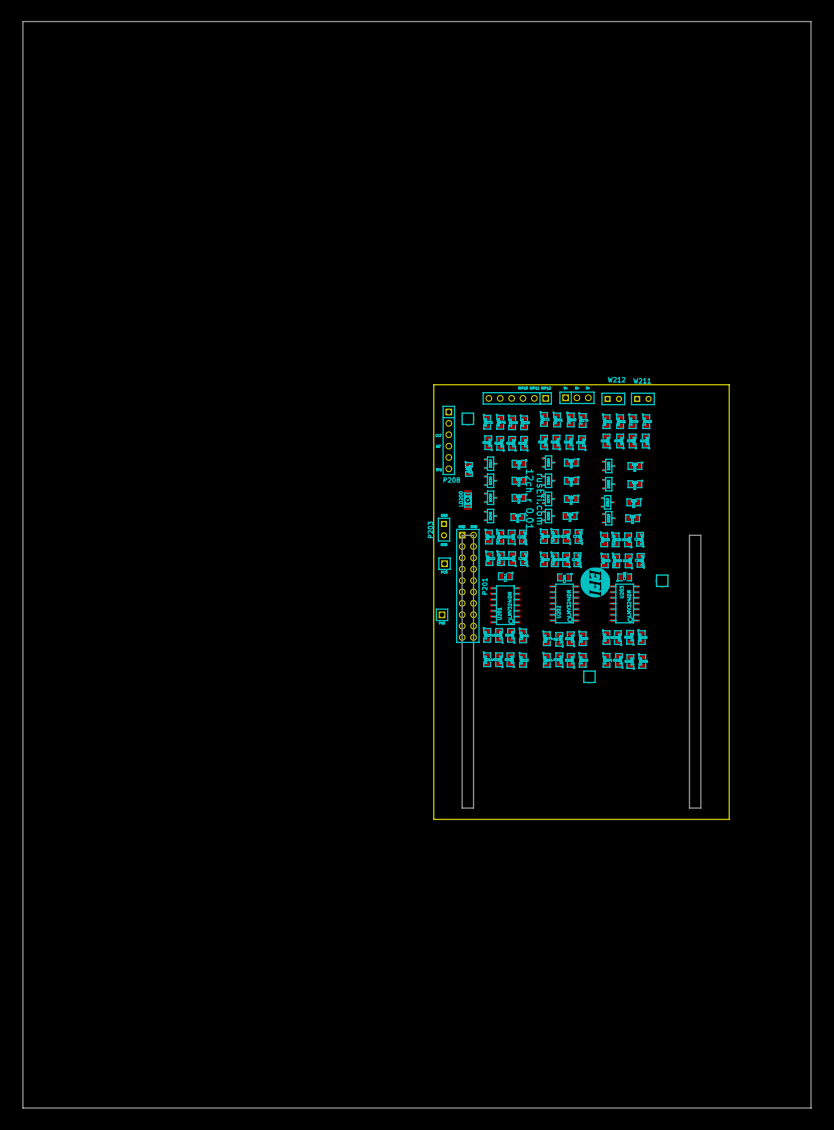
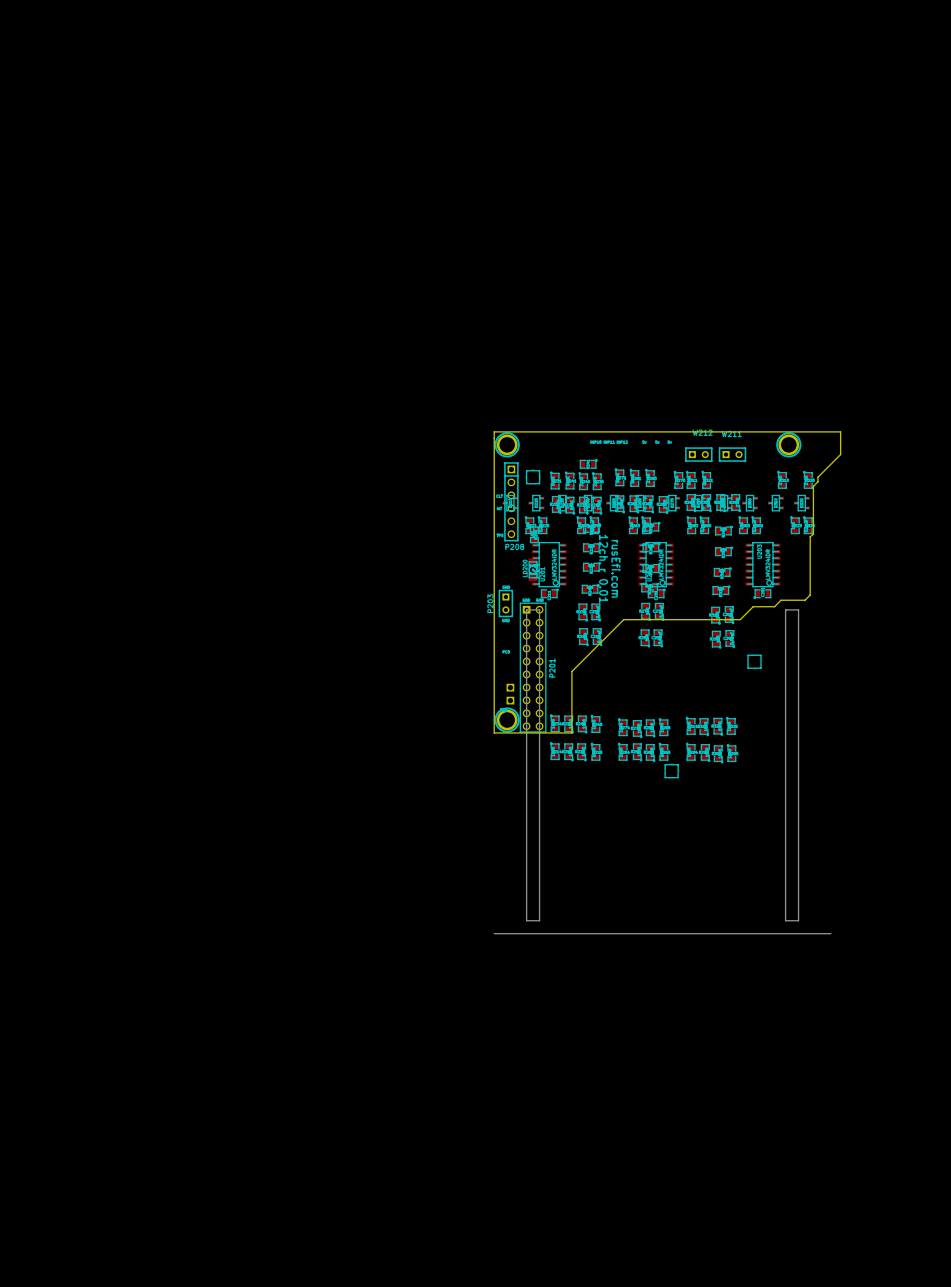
board edge: (433, 384) (729, 384) (729, 819) (433, 819) (433, 643) -> (494, 438) (494, 431) (840, 431) (840, 454) (817, 477) (817, 481) (813, 486) (813, 534) (810, 536) (810, 595) (805, 600) (781, 600) (774, 606) (753, 606) (740, 619) (623, 619) (571, 671) (571, 732) (494, 732)
part: none -> (507, 444)
part: none -> (788, 444)
part: (576, 397) -> none
part: (517, 398) -> none
part: none -> (588, 463)
part position: (582, 419) -> (678, 479)
part position: (632, 421) -> (807, 479)
part position: (645, 421) -> (782, 479)
part rotation: 0° (548, 462) -> 180° (614, 503)
part position: (548, 462) -> (614, 503)
part rotation: 0° (490, 463) -> 180° (510, 503)
part position: (490, 463) -> (510, 503)
part rotation: 0° (608, 465) -> 180° (724, 503)
part position: (608, 465) -> (724, 503)
part rotation: 0° (490, 480) -> 180° (536, 503)
part position: (490, 480) -> (536, 503)
part rotation: 0° (548, 480) -> 180° (639, 503)
part position: (548, 480) -> (639, 503)
part rotation: 0° (608, 484) -> 180° (749, 503)
part position: (608, 484) -> (749, 503)
part rotation: 0° (490, 497) -> 180° (562, 503)
part position: (490, 497) -> (562, 503)
part rotation: 0° (548, 498) -> 180° (672, 503)
part position: (548, 498) -> (672, 503)
part rotation: 0° (607, 502) -> 180° (775, 503)
part position: (607, 502) -> (775, 503)
part rotation: 0° (490, 515) -> 180° (588, 503)
part position: (490, 515) -> (588, 503)
part rotation: 0° (548, 515) -> 180° (698, 503)
part position: (548, 515) -> (698, 503)
part rotation: 0° (608, 518) -> 180° (801, 503)
part position: (608, 518) -> (801, 503)
part position: (543, 535) -> (691, 525)
part position: (554, 535) -> (704, 525)
part position: (488, 536) -> (581, 525)
part position: (499, 536) -> (594, 525)
part position: (603, 539) -> (794, 525)
part position: (615, 539) -> (807, 525)
part position: (489, 558) -> (529, 525)
part position: (500, 558) -> (542, 525)
part position: (543, 559) -> (633, 525)
part position: (554, 559) -> (646, 525)
part position: (604, 560) -> (743, 525)
part position: (615, 560) -> (756, 525)
part side: top (444, 563) -> bottom (510, 687)
drawing: [580, 567, 611, 598] -> none
part position: (505, 575) -> (549, 593)
part position: (565, 577) -> (656, 593)
part position: (624, 577) -> (762, 594)
part position: (564, 603) -> (656, 564)
part position: (624, 603) -> (762, 564)
part position: (505, 605) -> (549, 564)
part side: top (442, 614) -> bottom (510, 700)
part: none -> (507, 720)
line: none -> (494, 933) (830, 933)
line: (811, 1108) (811, 21) (22, 21) (22, 1108) (811, 1108) -> none

